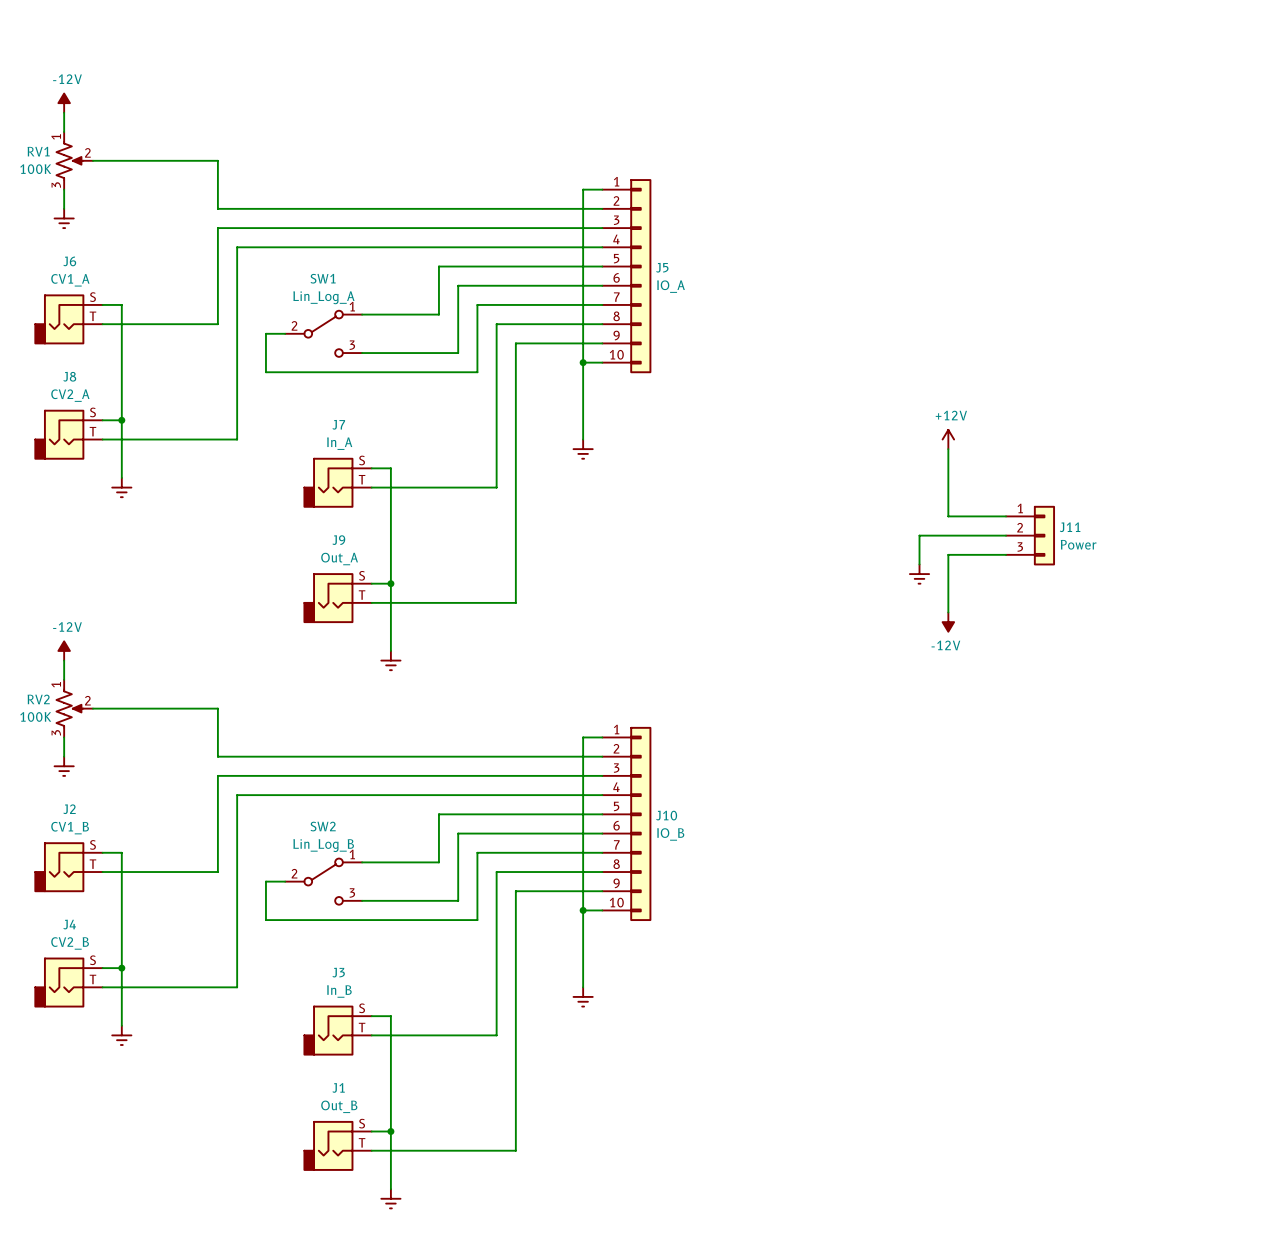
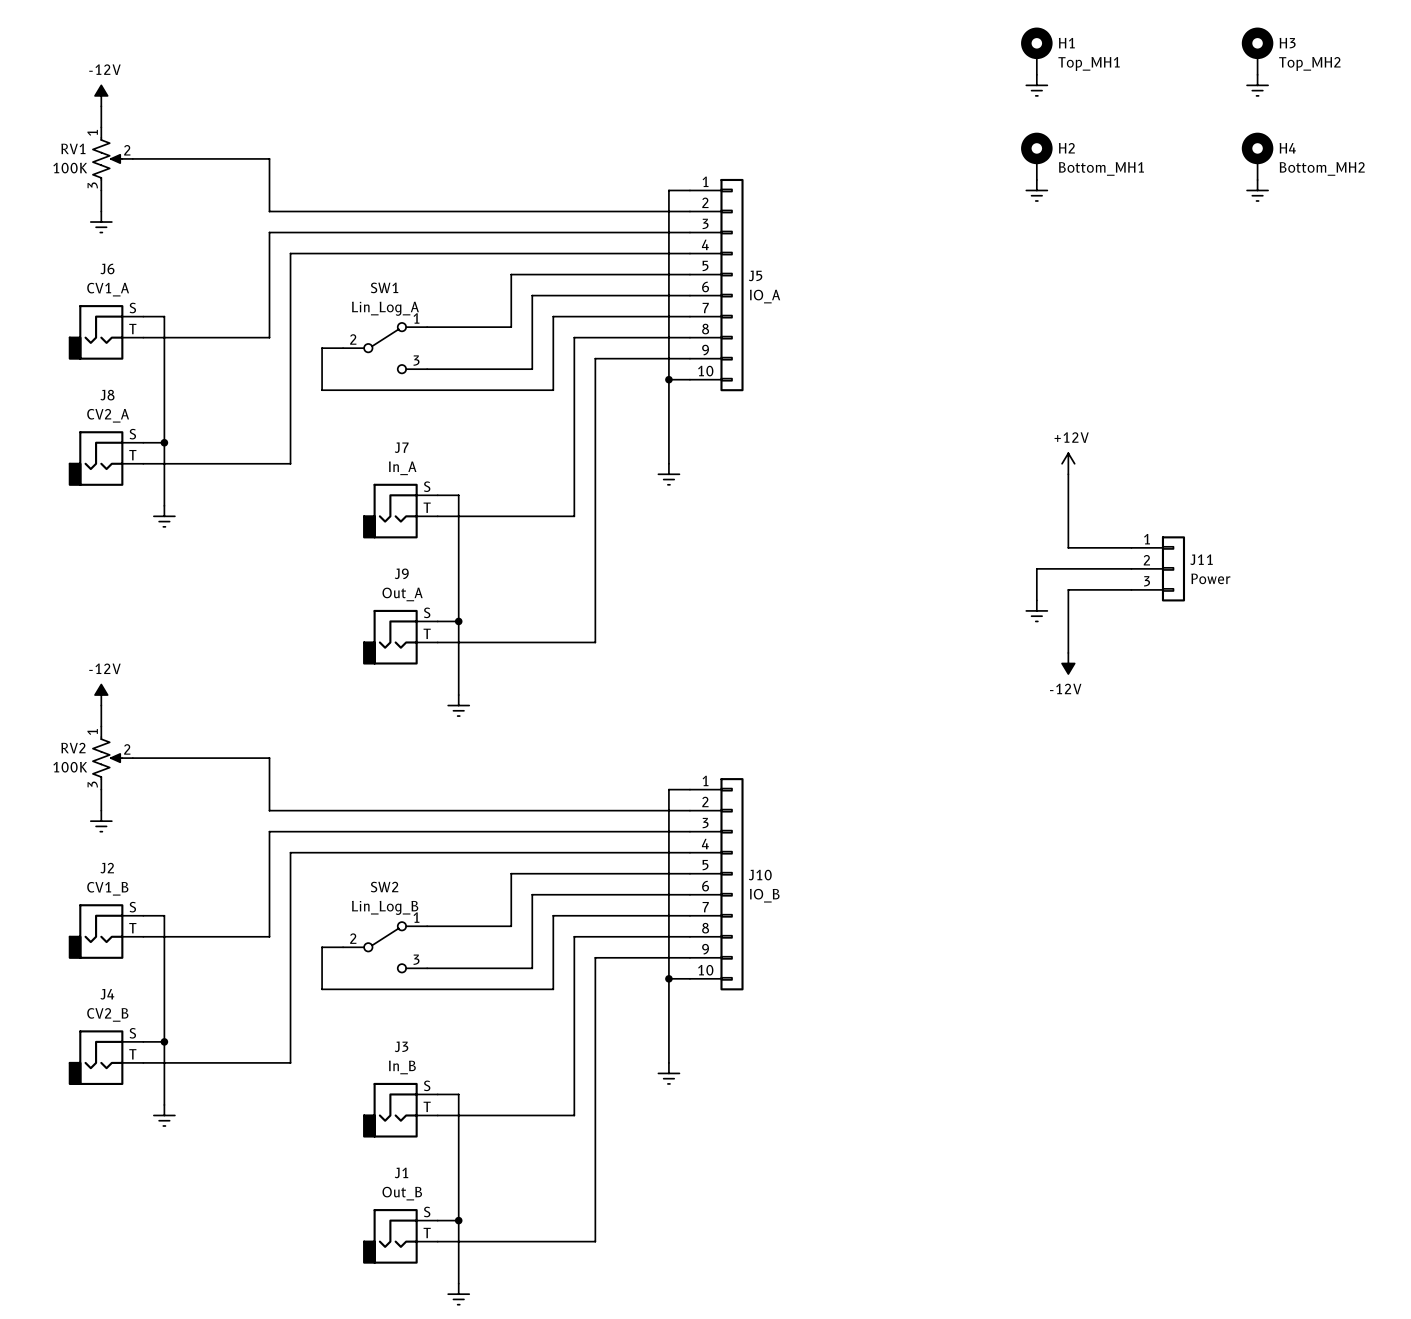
H1: none -> Top_MH1 (1036, 51)
H3: none -> Top_MH2 (1257, 51)
power symbol: none -> (1036, 85)
power symbol: none -> (1257, 85)
H2: none -> Bottom_MH1 (1036, 156)
H4: none -> Bottom_MH2 (1257, 156)
power symbol: none -> (1036, 190)
power symbol: none -> (1257, 190)

